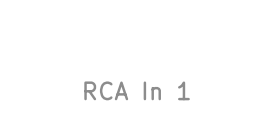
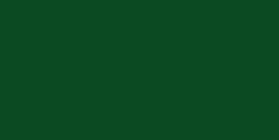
text: RCA In 1 (137, 90) -> none

